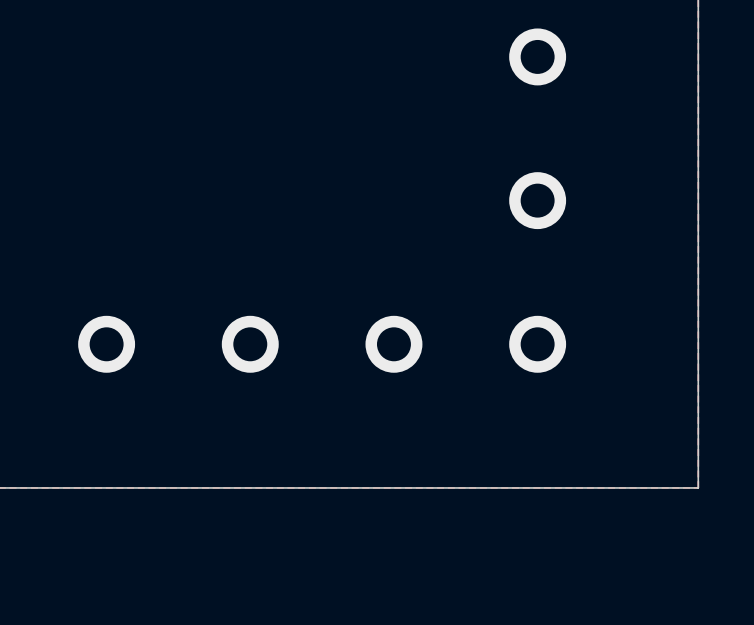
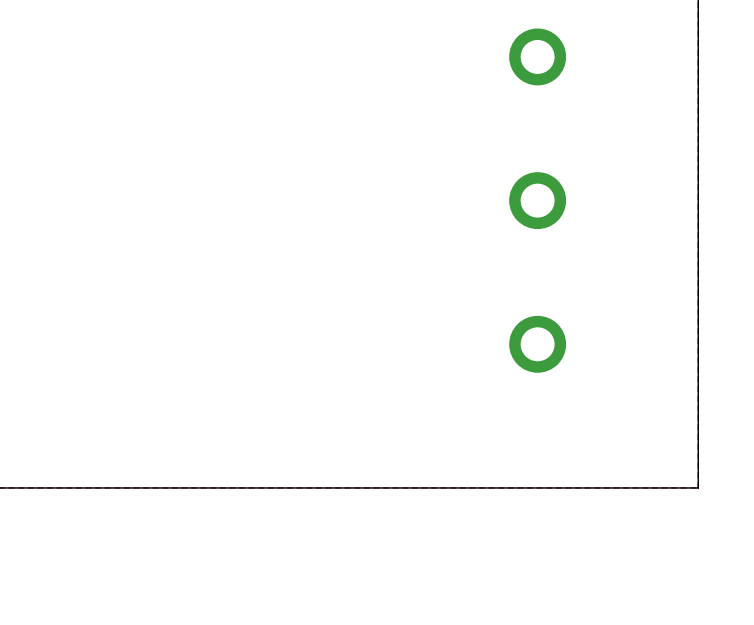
via: (106, 344) -> none
via: (250, 344) -> none
via: (393, 344) -> none

